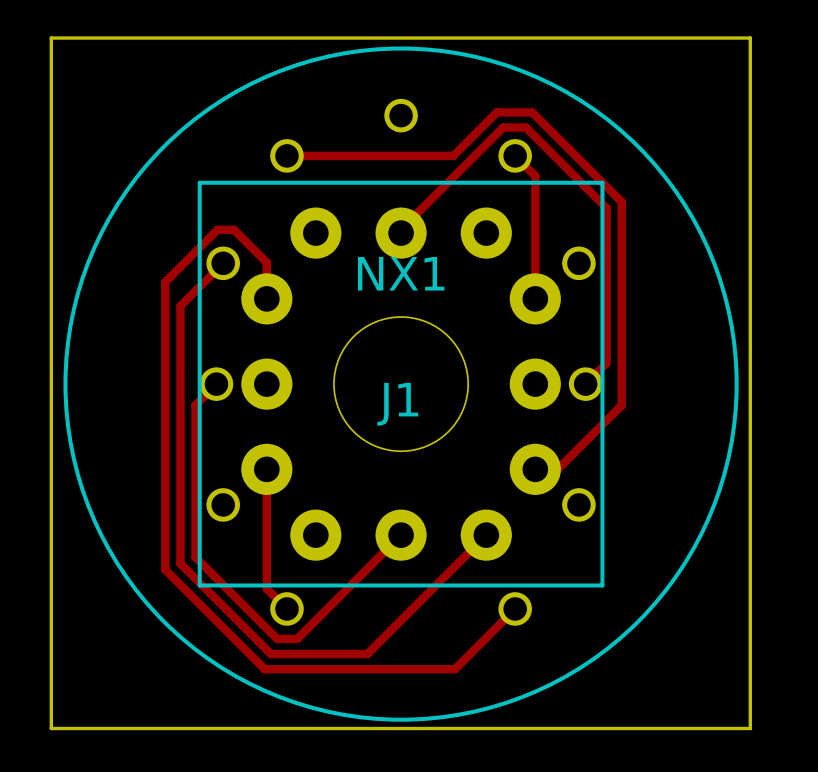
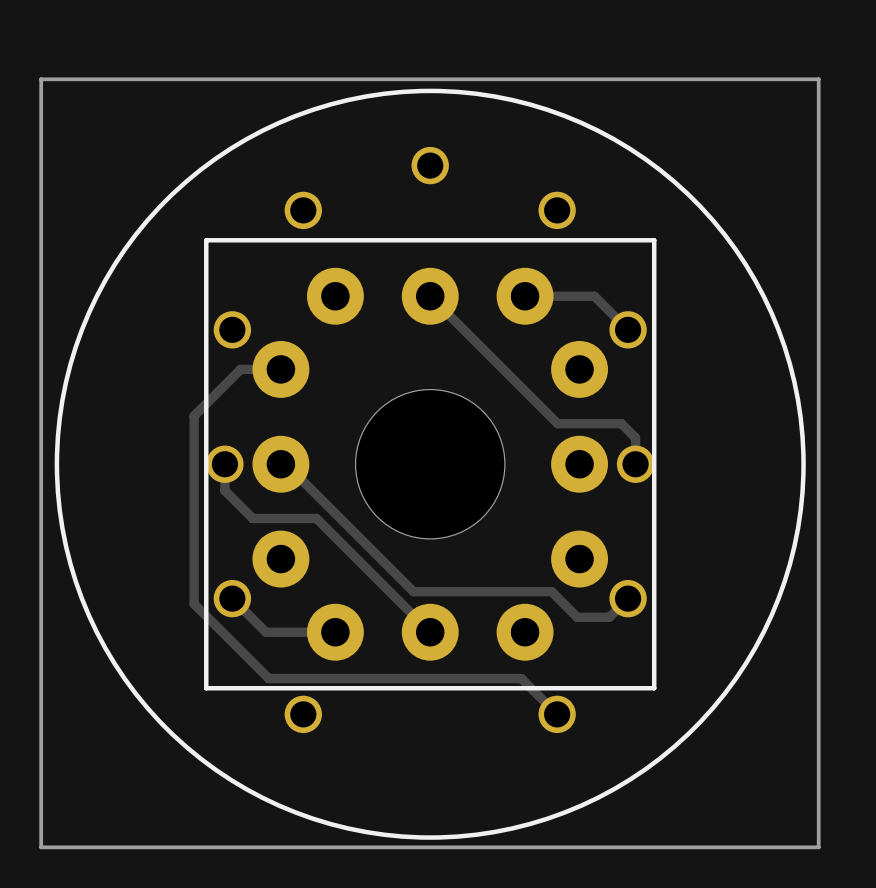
track: (286, 155) (453, 155) (496, 112) (532, 112) (621, 201) (621, 405) (557, 469) (535, 469) -> none
track: (515, 155) (535, 176) (535, 298) -> none
track: (401, 233) (401, 229) (503, 127) (525, 127) (606, 208) (606, 363) (585, 384) -> (430, 296) (557, 423) (621, 423) (635, 437) (635, 464)
track: none -> (525, 296) (594, 296) (628, 329)
track: (223, 263) (180, 306) (180, 563) (270, 654) (367, 654) (486, 535) -> none
NX1 name: NX1 (401, 273) -> none
track: (266, 298) (266, 262) (233, 229) (217, 229) (165, 282) (165, 569) (264, 669) (454, 669) (515, 608) -> (280, 369) (240, 369) (194, 415) (194, 603) (268, 678) (521, 678) (557, 714)
track: (216, 384) (195, 405) (195, 557) (277, 639) (297, 639) (401, 535) -> (224, 464) (224, 490) (252, 518) (316, 518) (430, 632)
track: none -> (280, 464) (286, 464) (413, 591) (551, 591) (577, 617) (609, 617) (628, 598)
J1 name: J1 (397, 404) -> none
track: (266, 469) (266, 588) (286, 608) -> none
track: none -> (232, 598) (265, 632) (335, 632)

